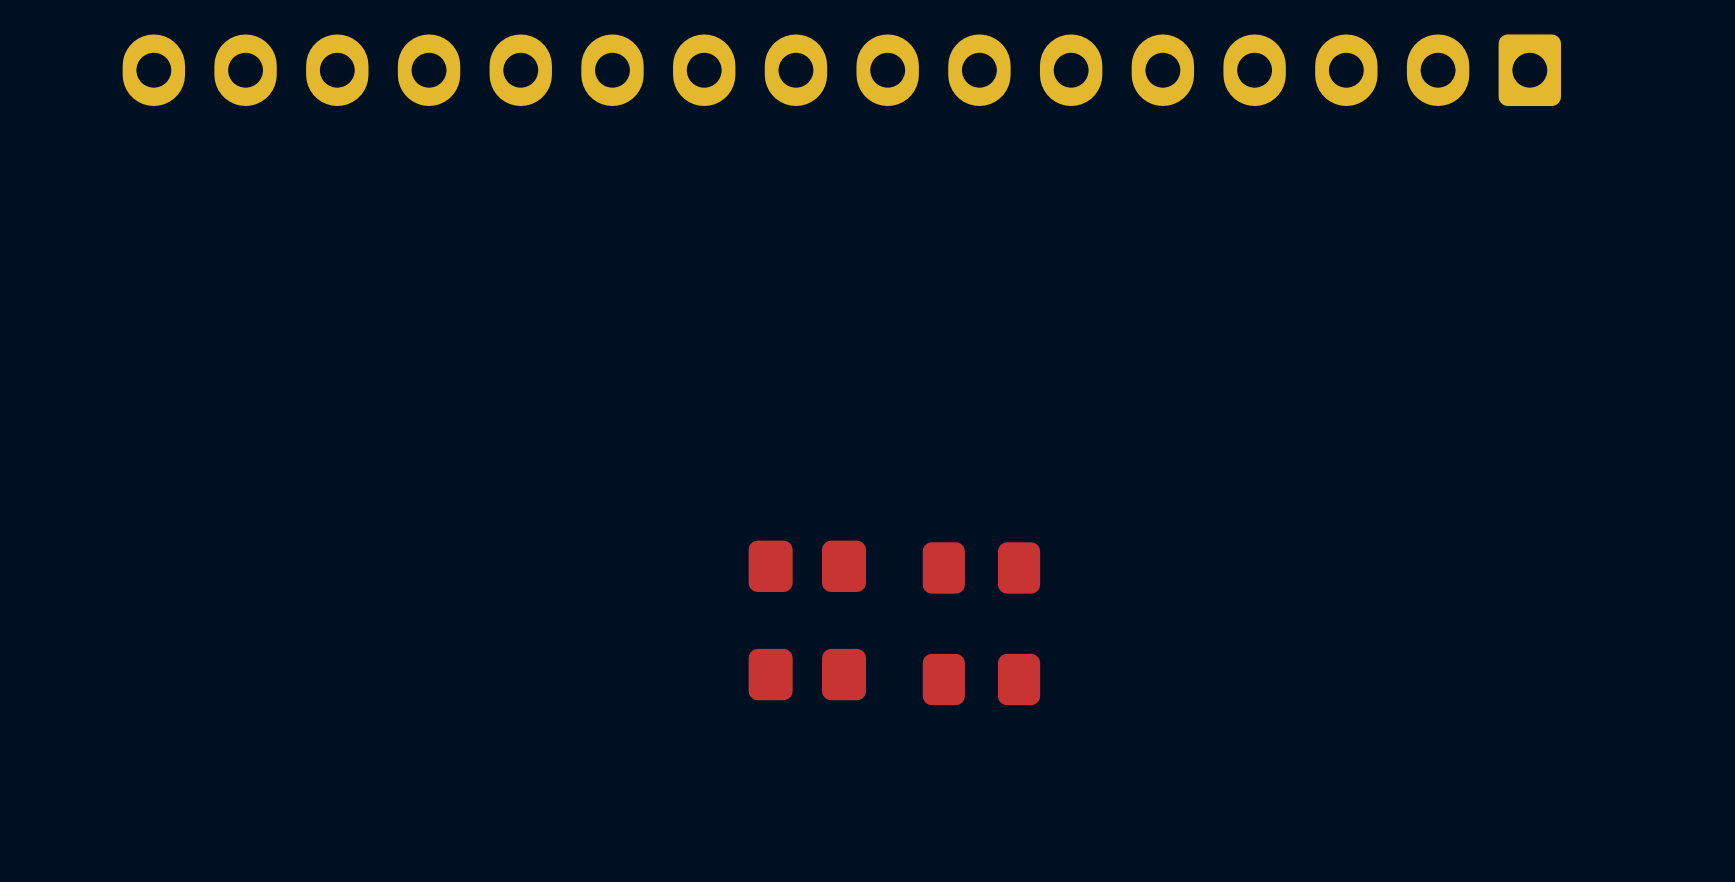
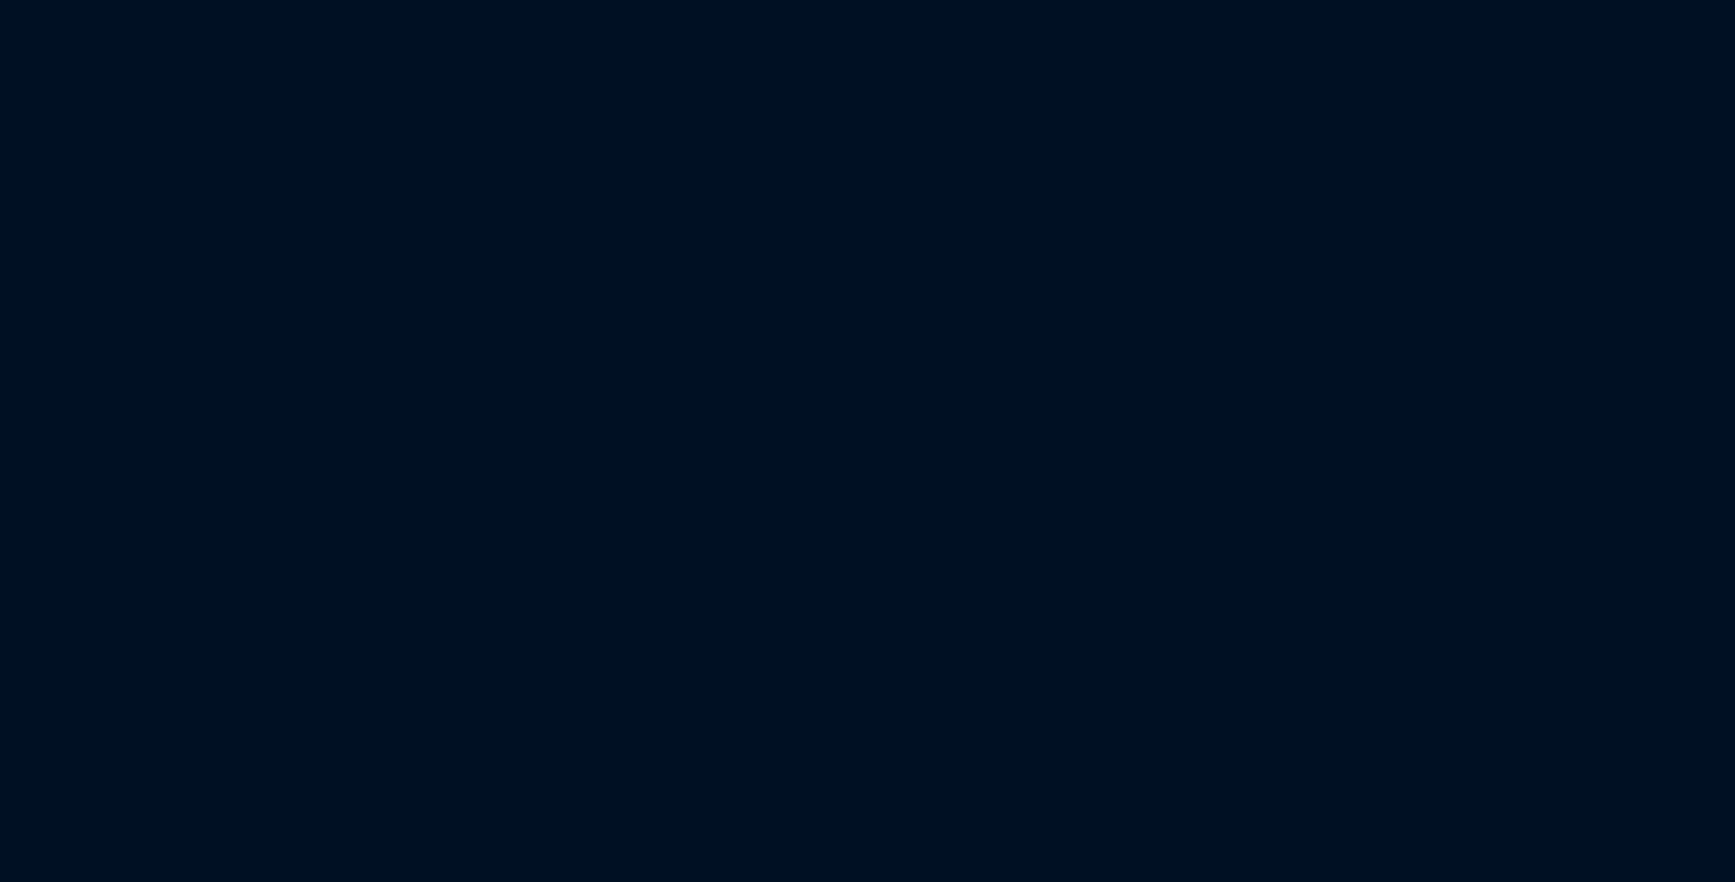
part: (841, 70) -> none
part: (807, 566) -> none
part: (981, 567) -> none
part: (807, 674) -> none
part: (981, 679) -> none

